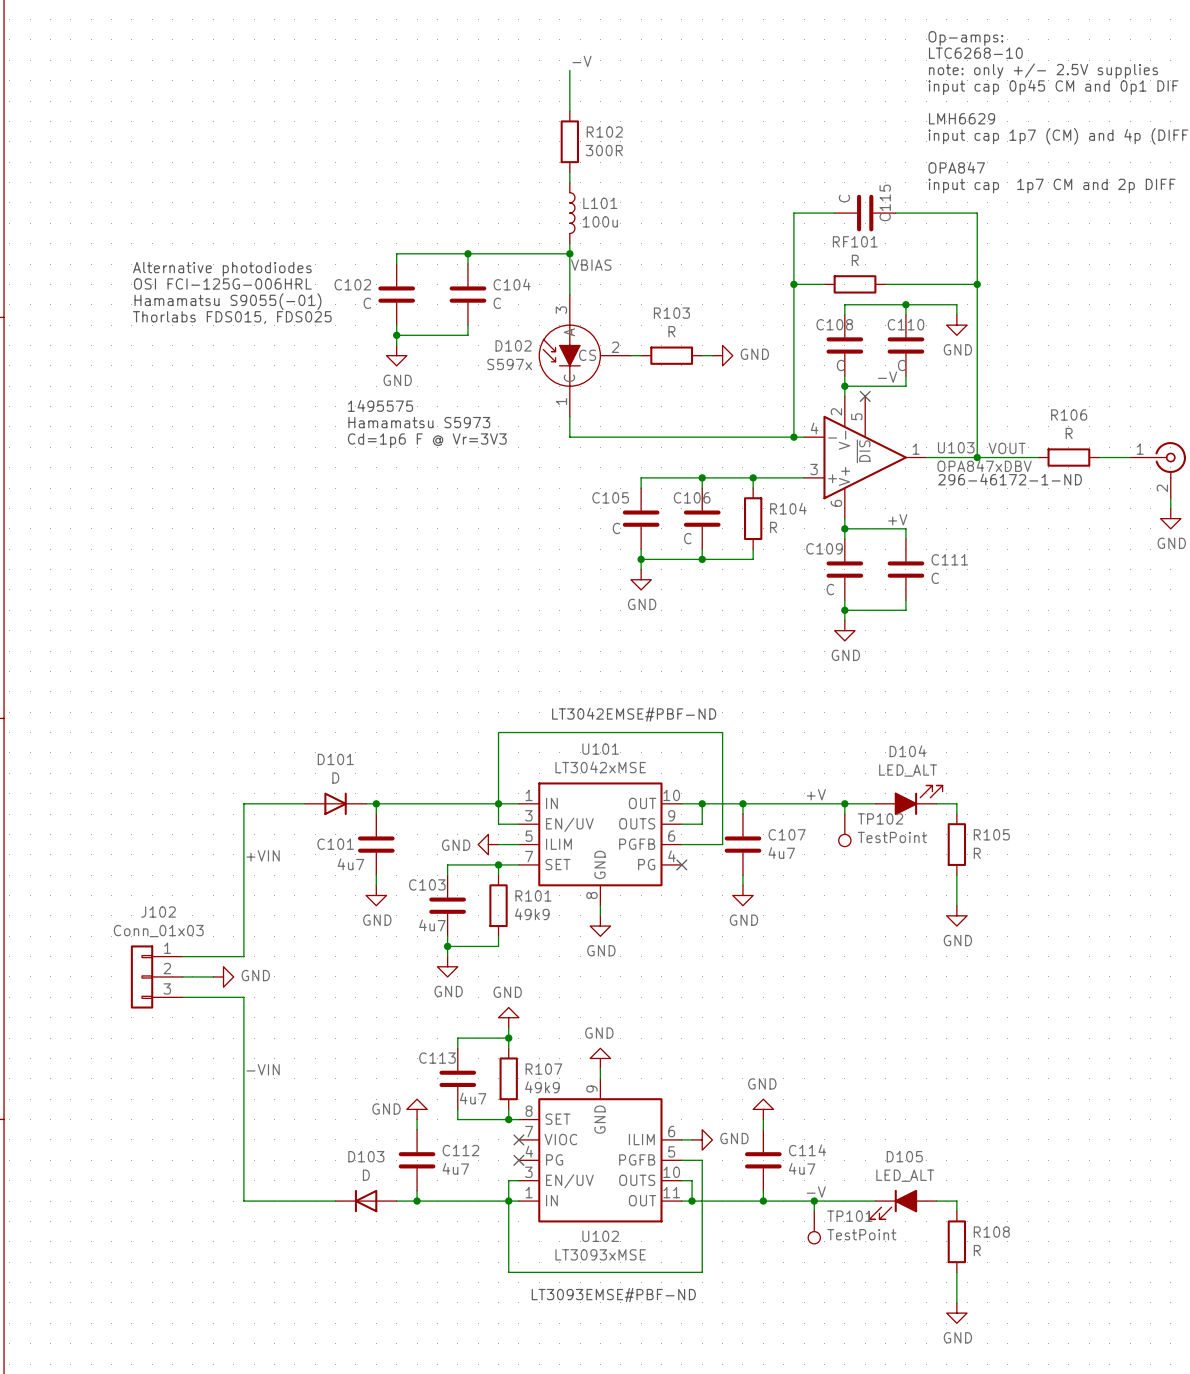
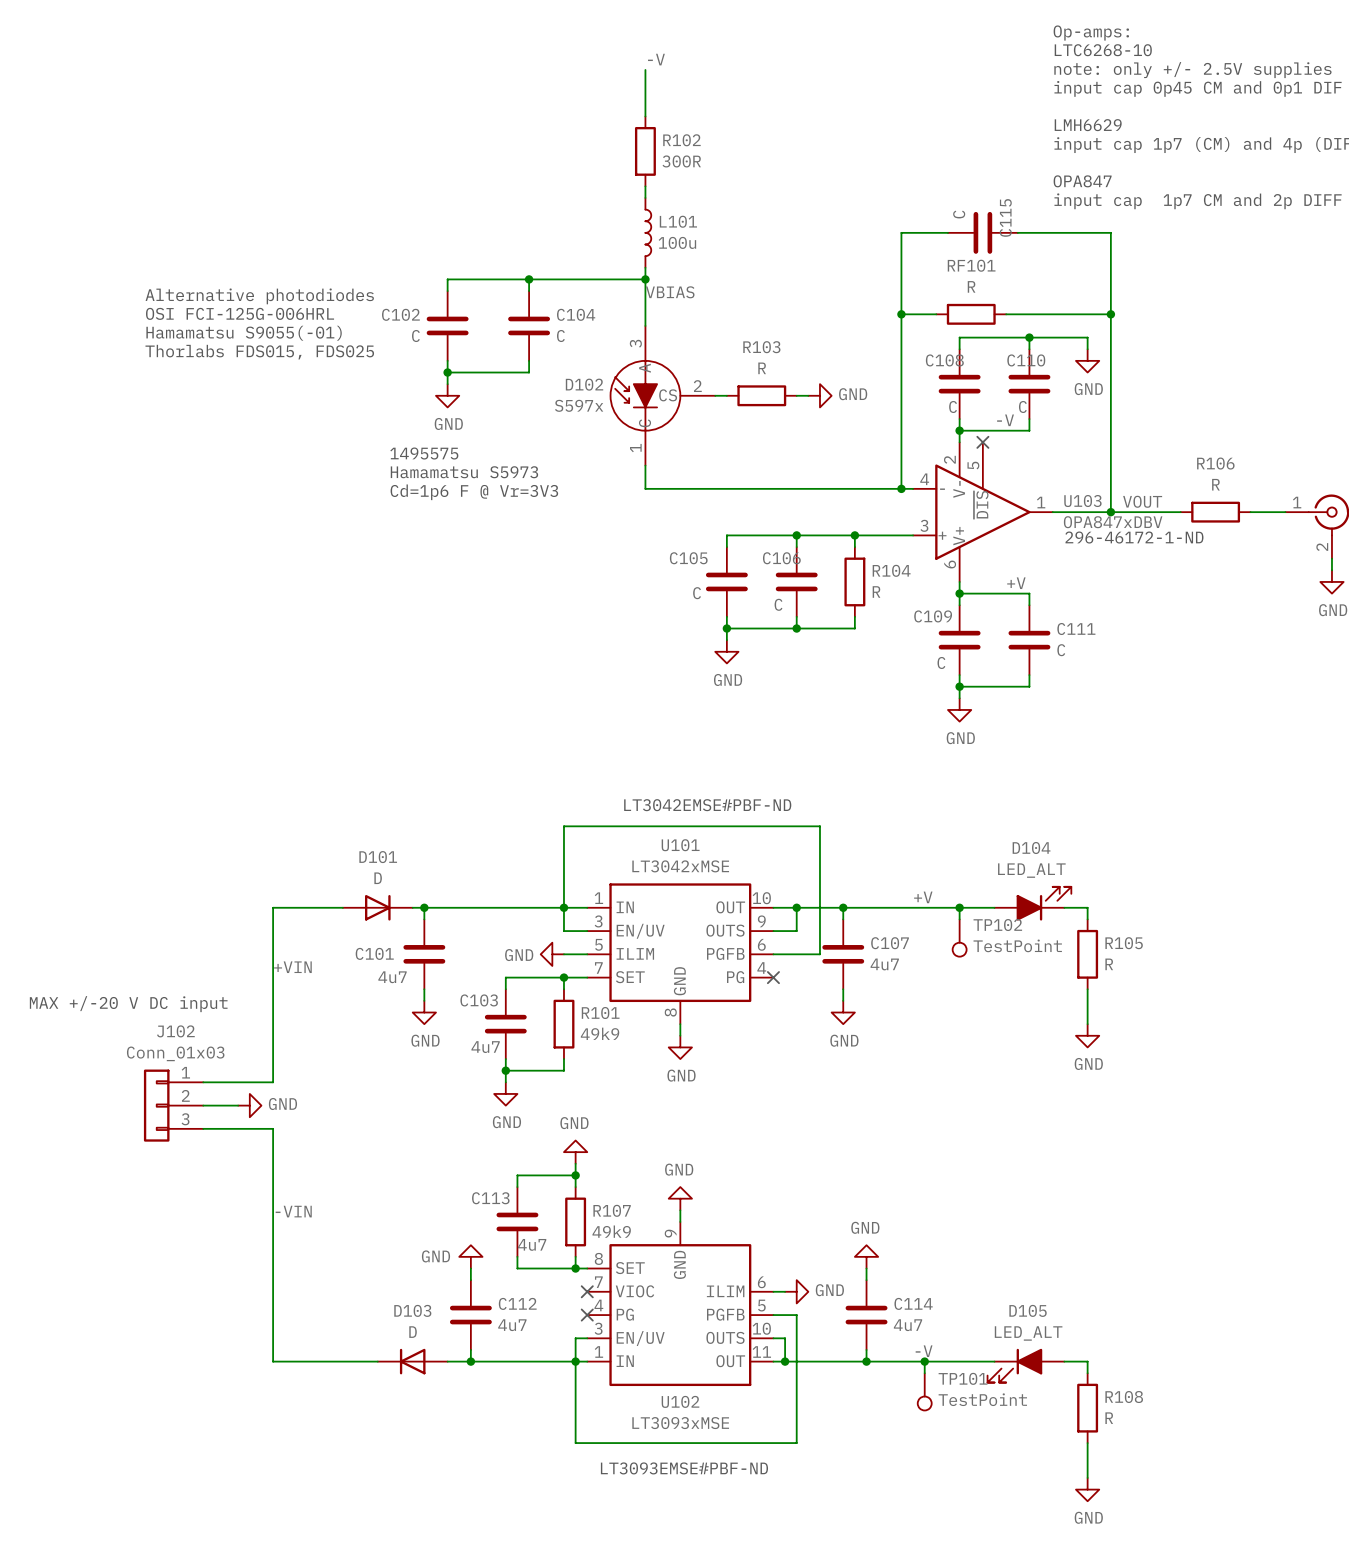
text: none -> MAX +/-20 V DC input (128, 1004)

